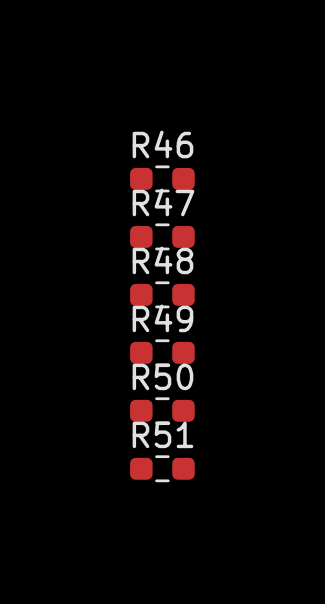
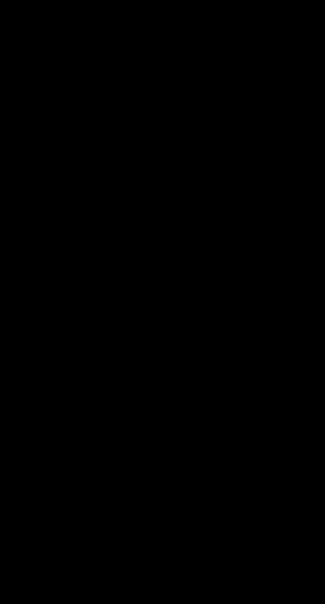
R46: (162, 178) -> none
R47: (162, 236) -> none
R48: (162, 294) -> none
R49: (162, 352) -> none
R50: (162, 410) -> none
R51: (162, 468) -> none

